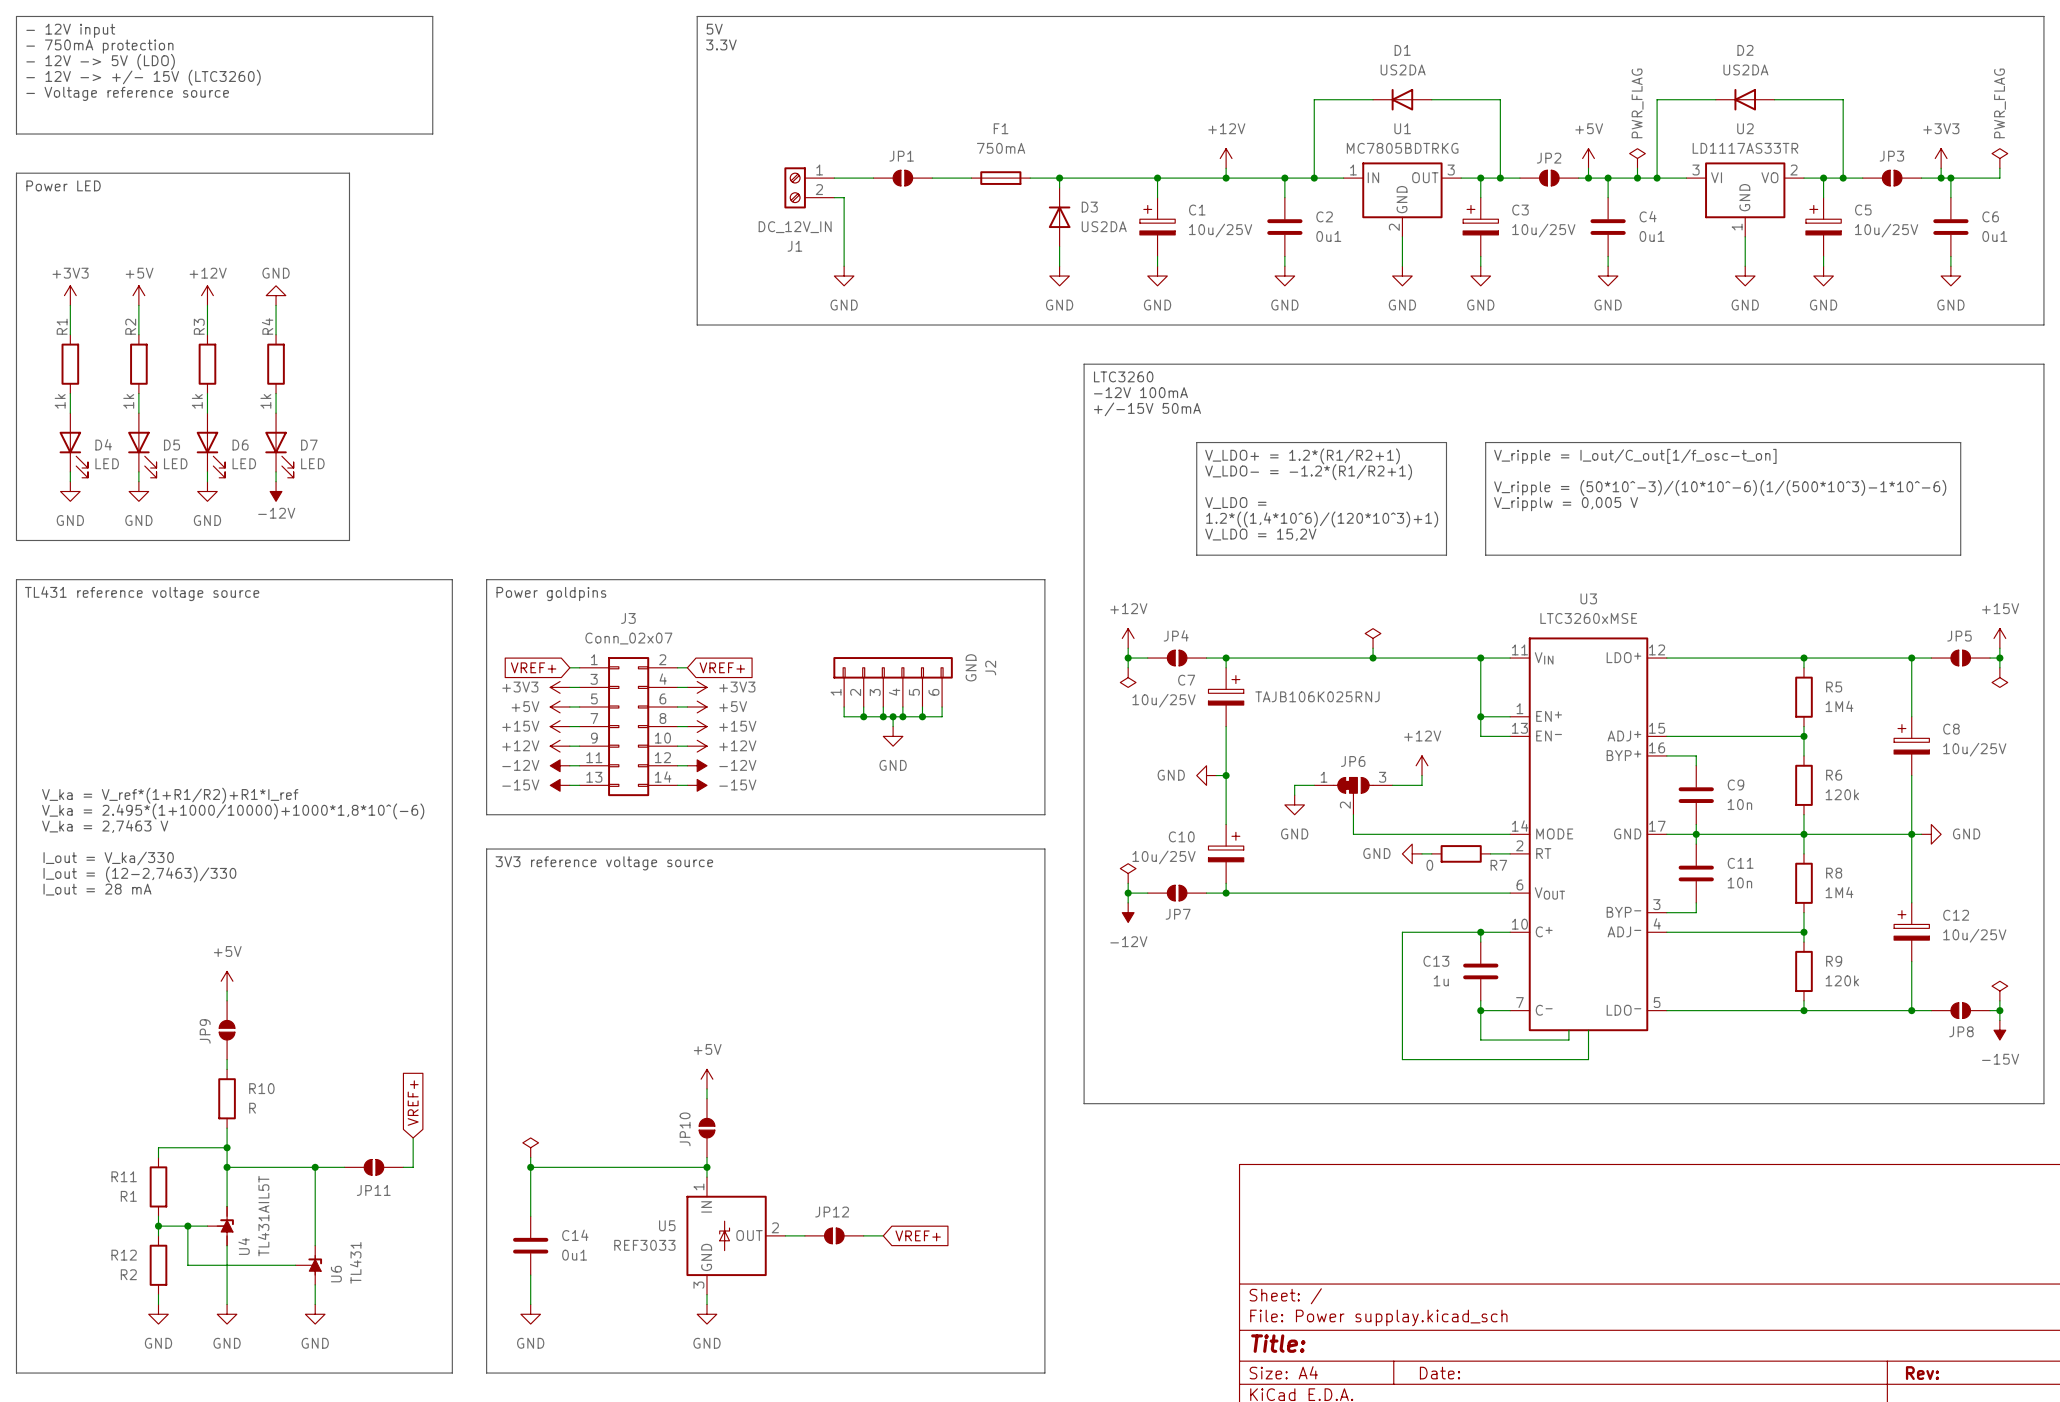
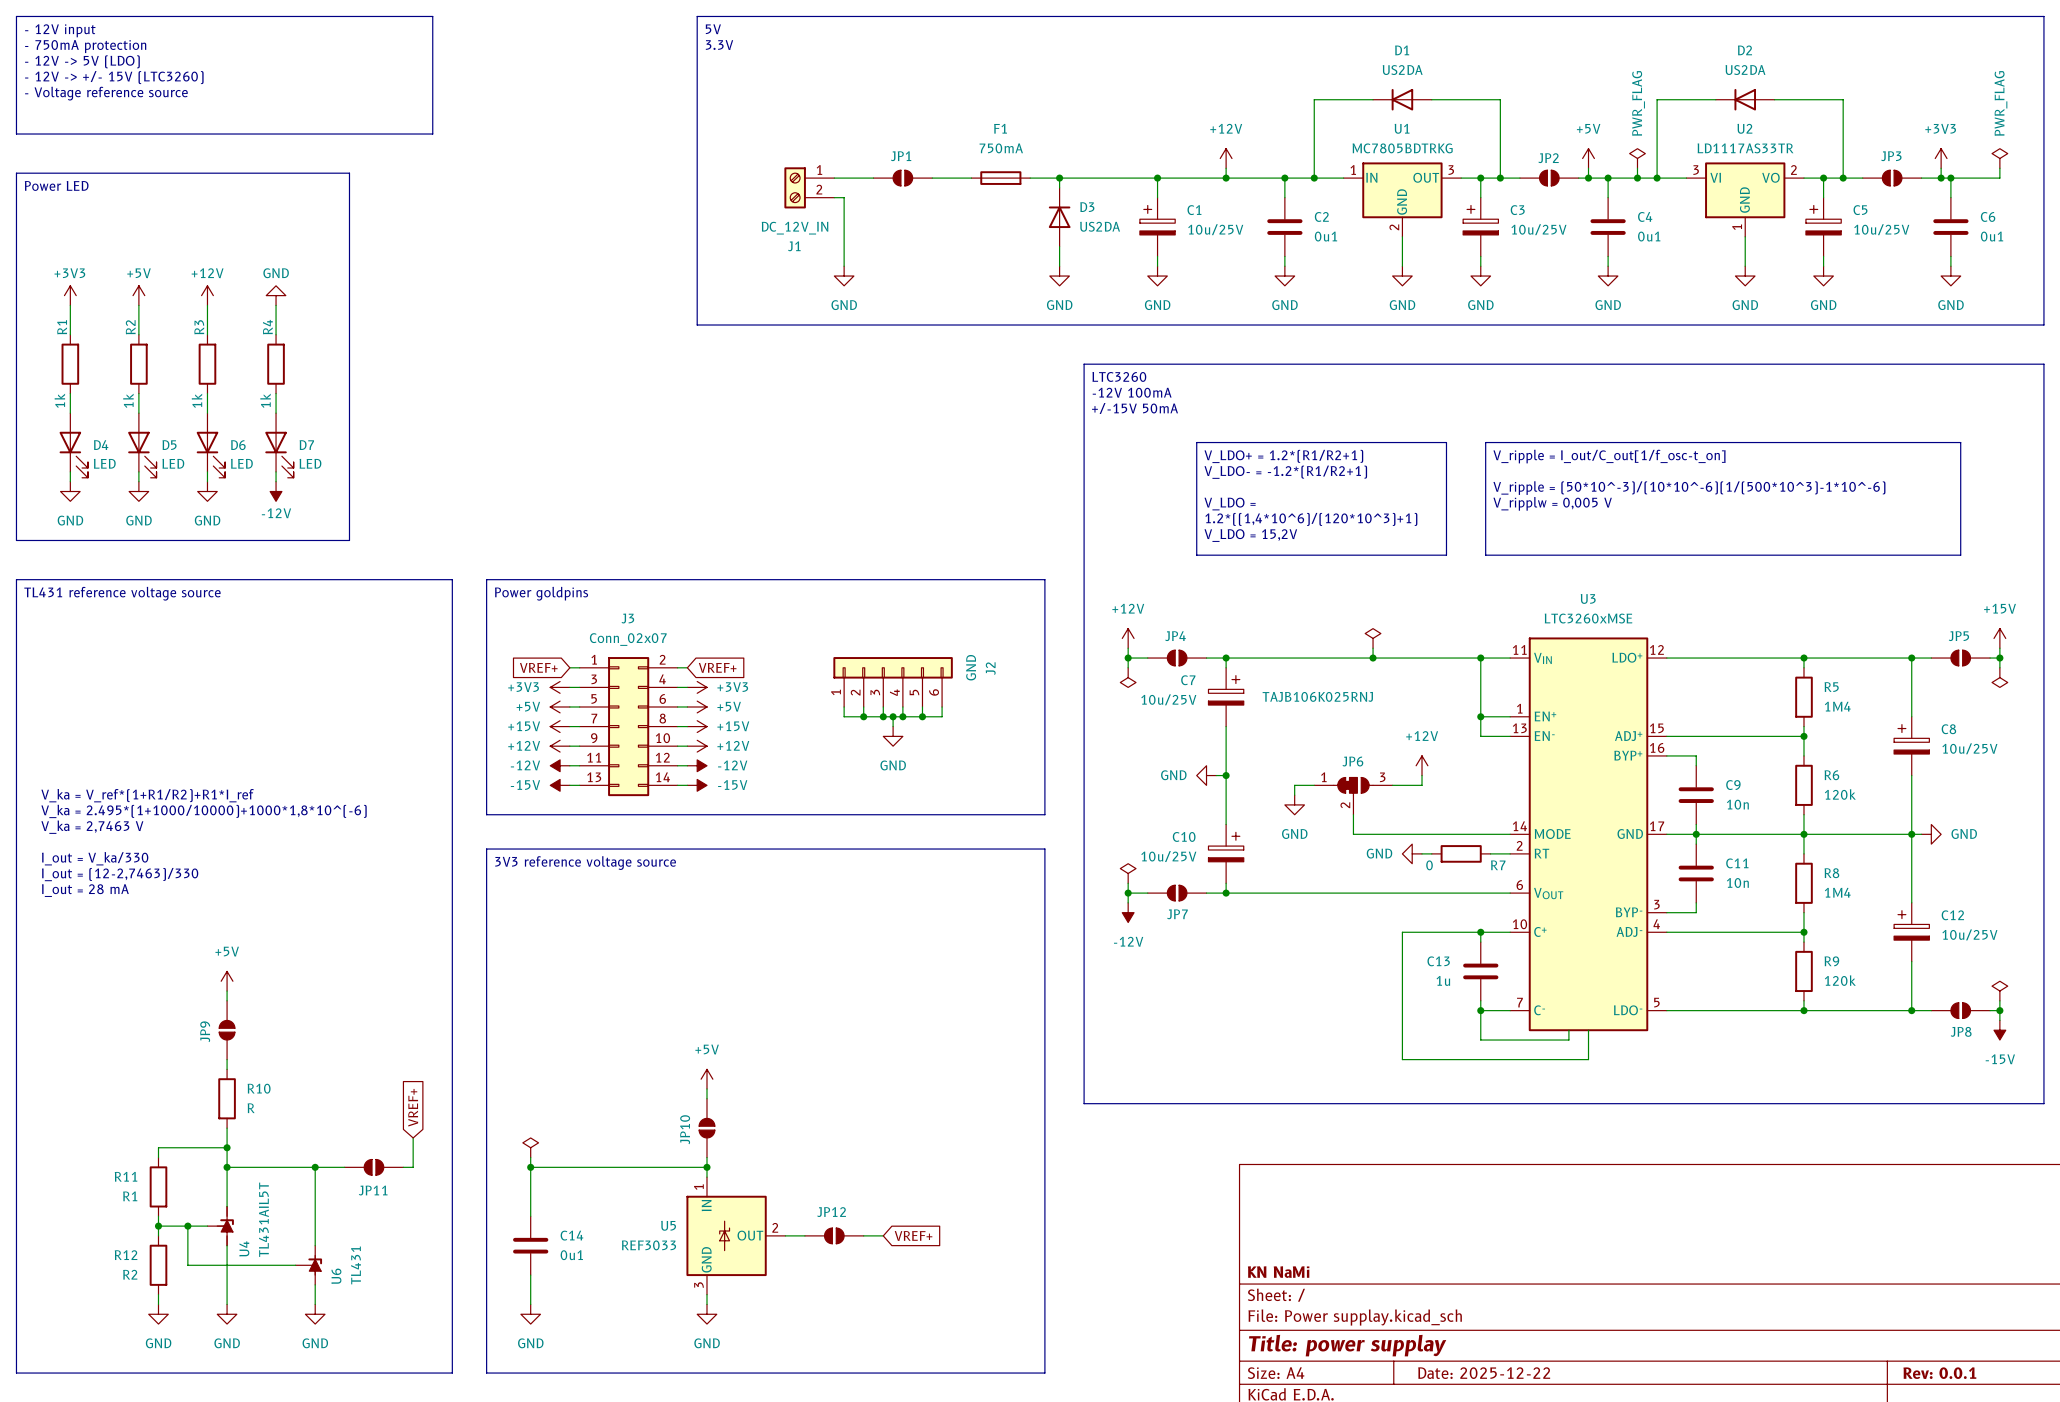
title block: none -> KN NaMi (1278, 1272)
title block: Title: (1278, 1343) -> Title: power supplay (1347, 1345)
title block: Date: (1439, 1373) -> Date: 2025-12-22 (1484, 1373)
title block: Rev: (1922, 1373) -> Rev: 0.0.1 (1939, 1373)

